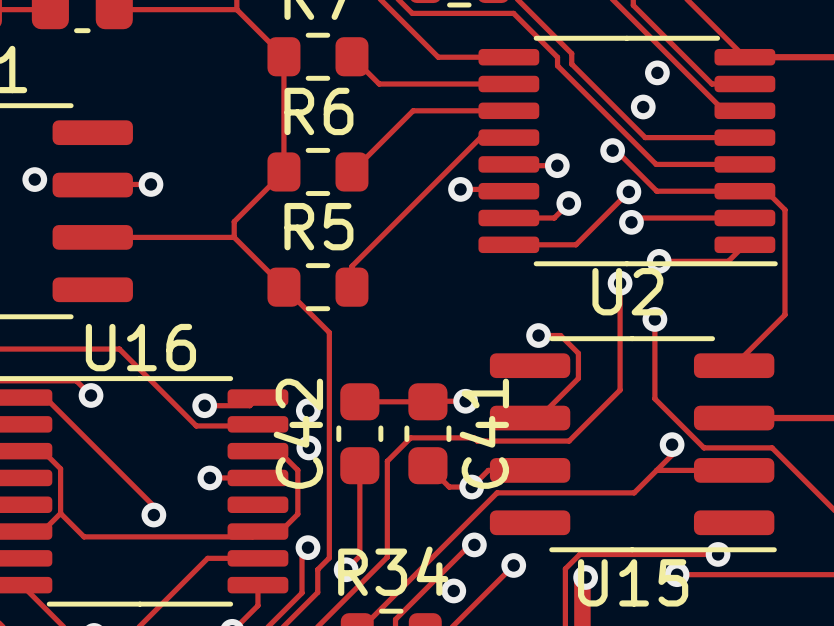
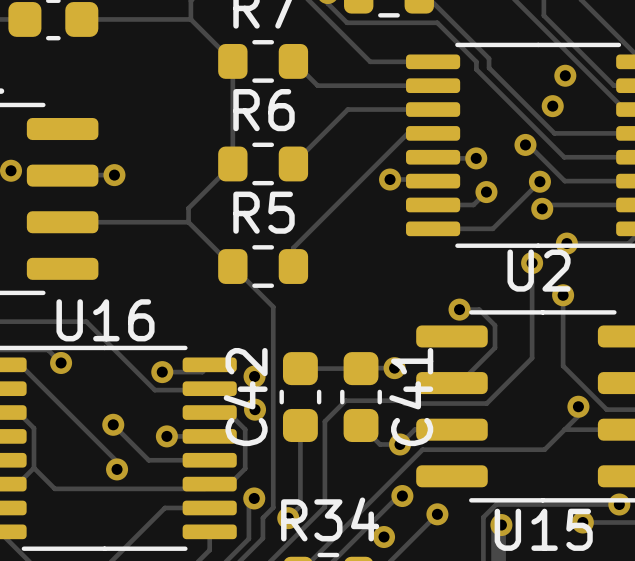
track: none -> (113, 424) (148, 460) (209, 460)
via: none -> (113, 424)

